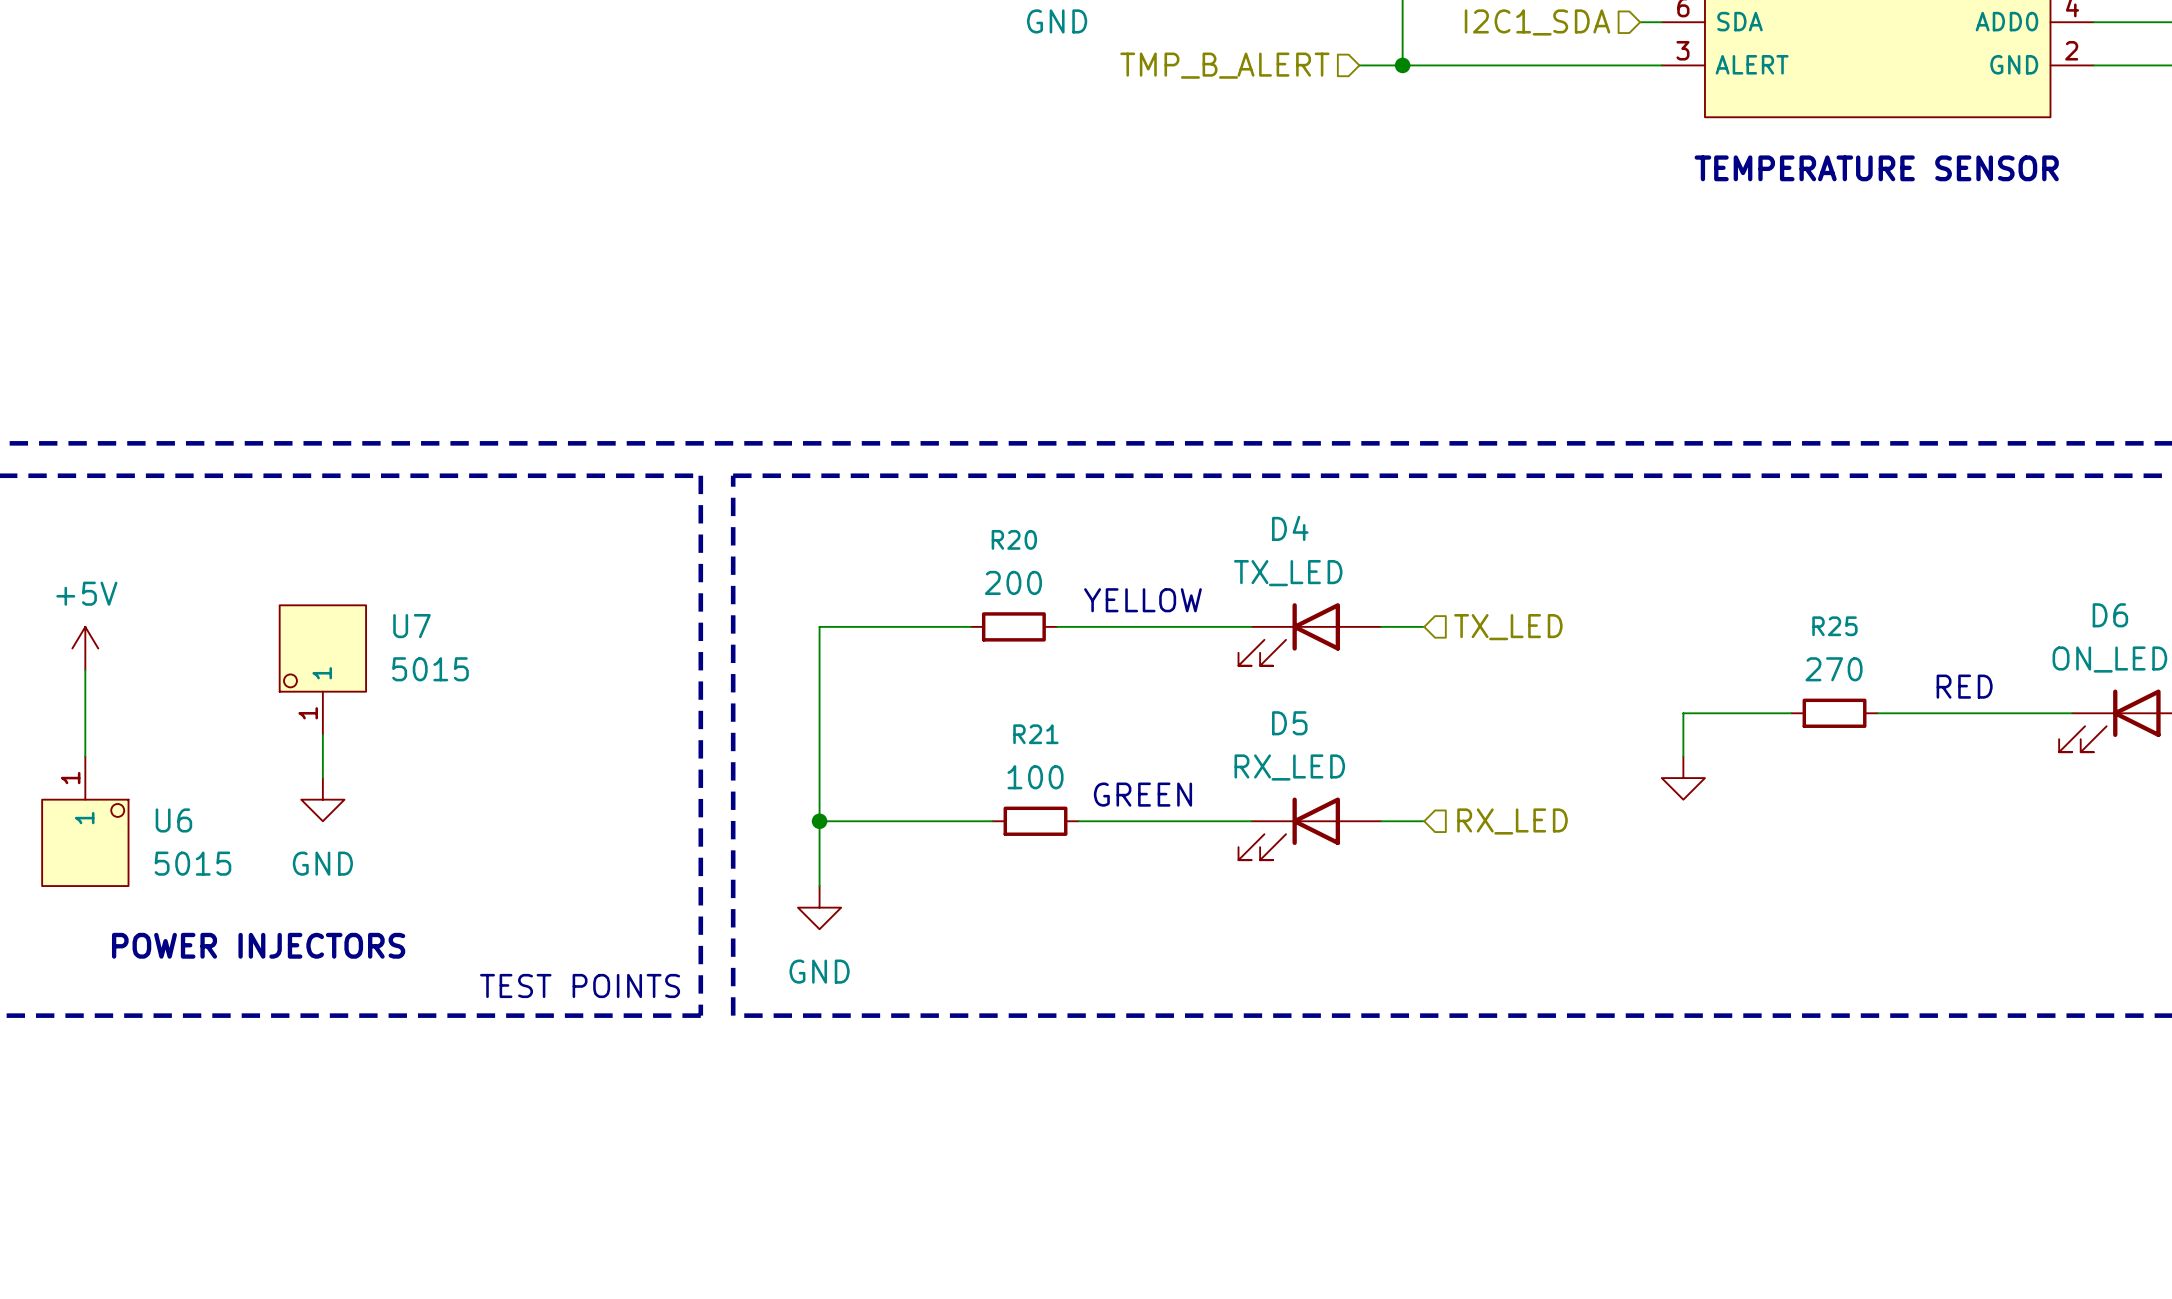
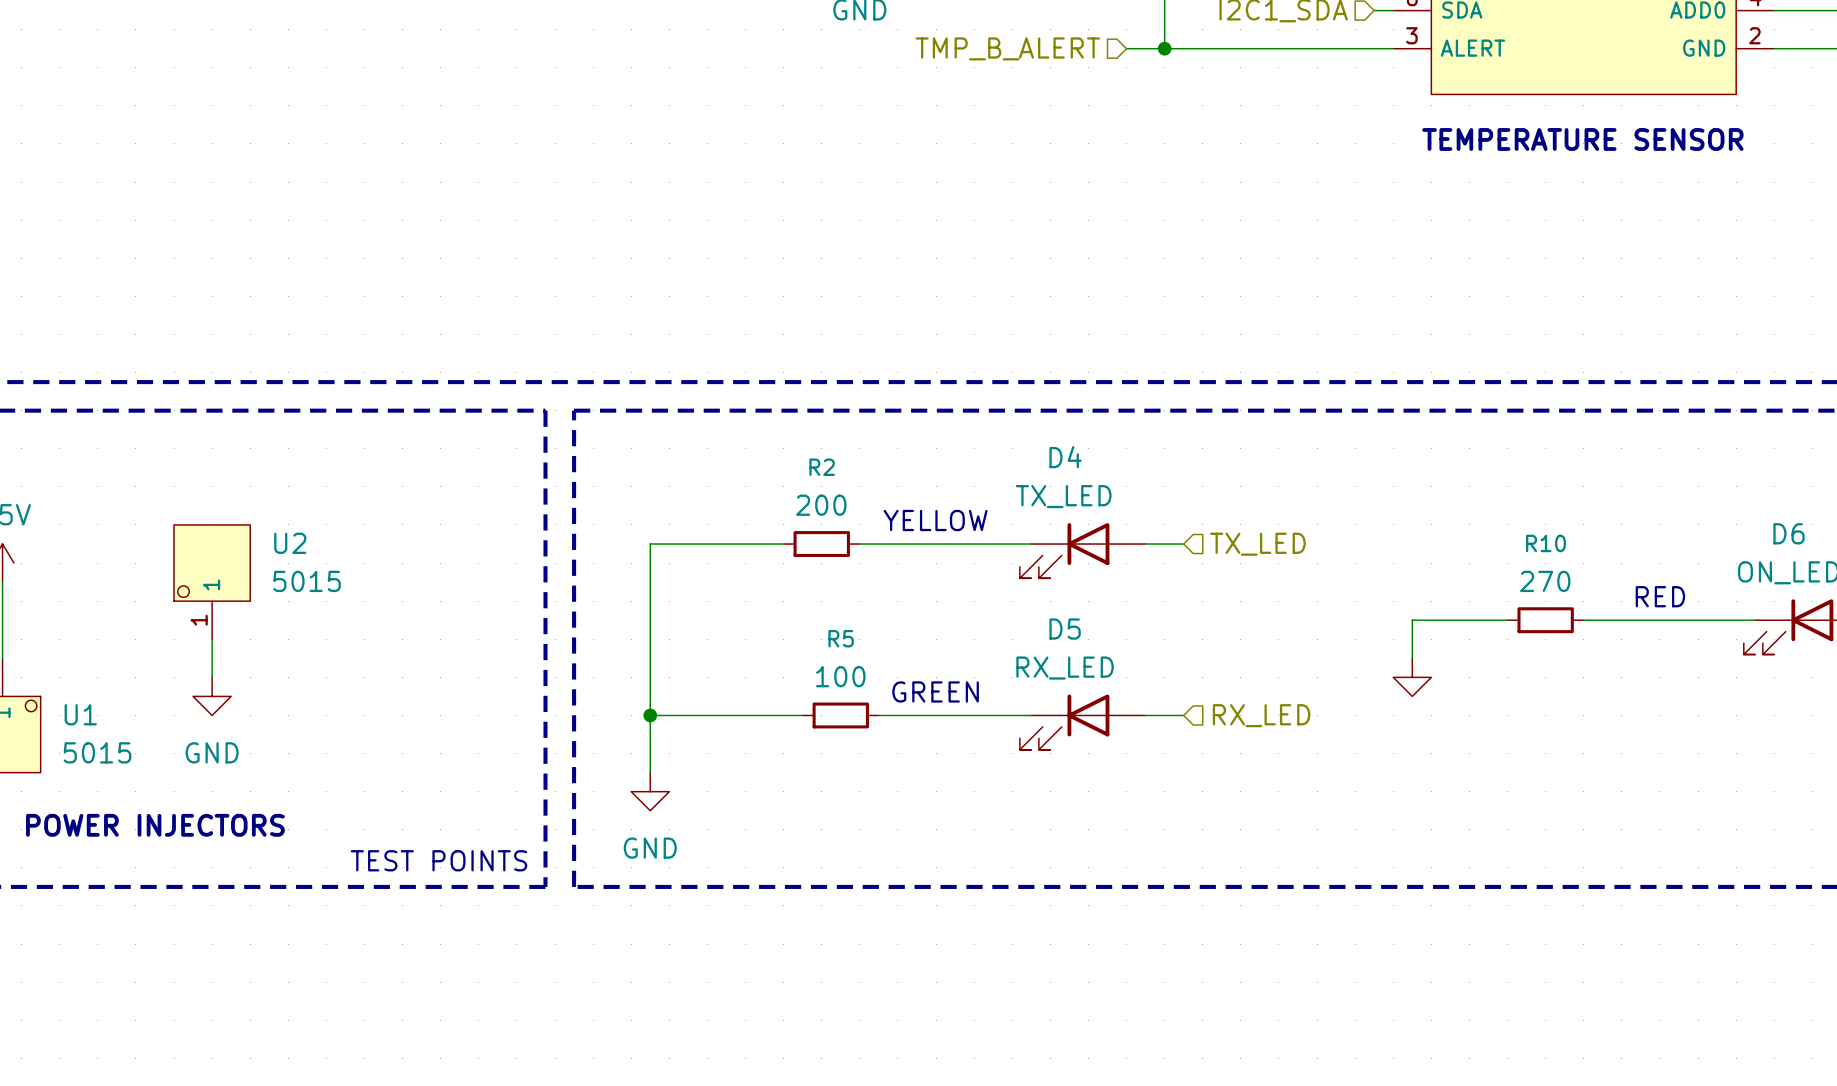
R20 name: R20 (1014, 539) -> R2 (822, 467)
U7 name: U7 (411, 626) -> U2 (290, 543)
R25 name: R25 (1834, 626) -> R10 (1546, 543)
R21 name: R21 (1035, 734) -> R5 (841, 638)
U6 name: U6 (173, 820) -> U1 (80, 714)

